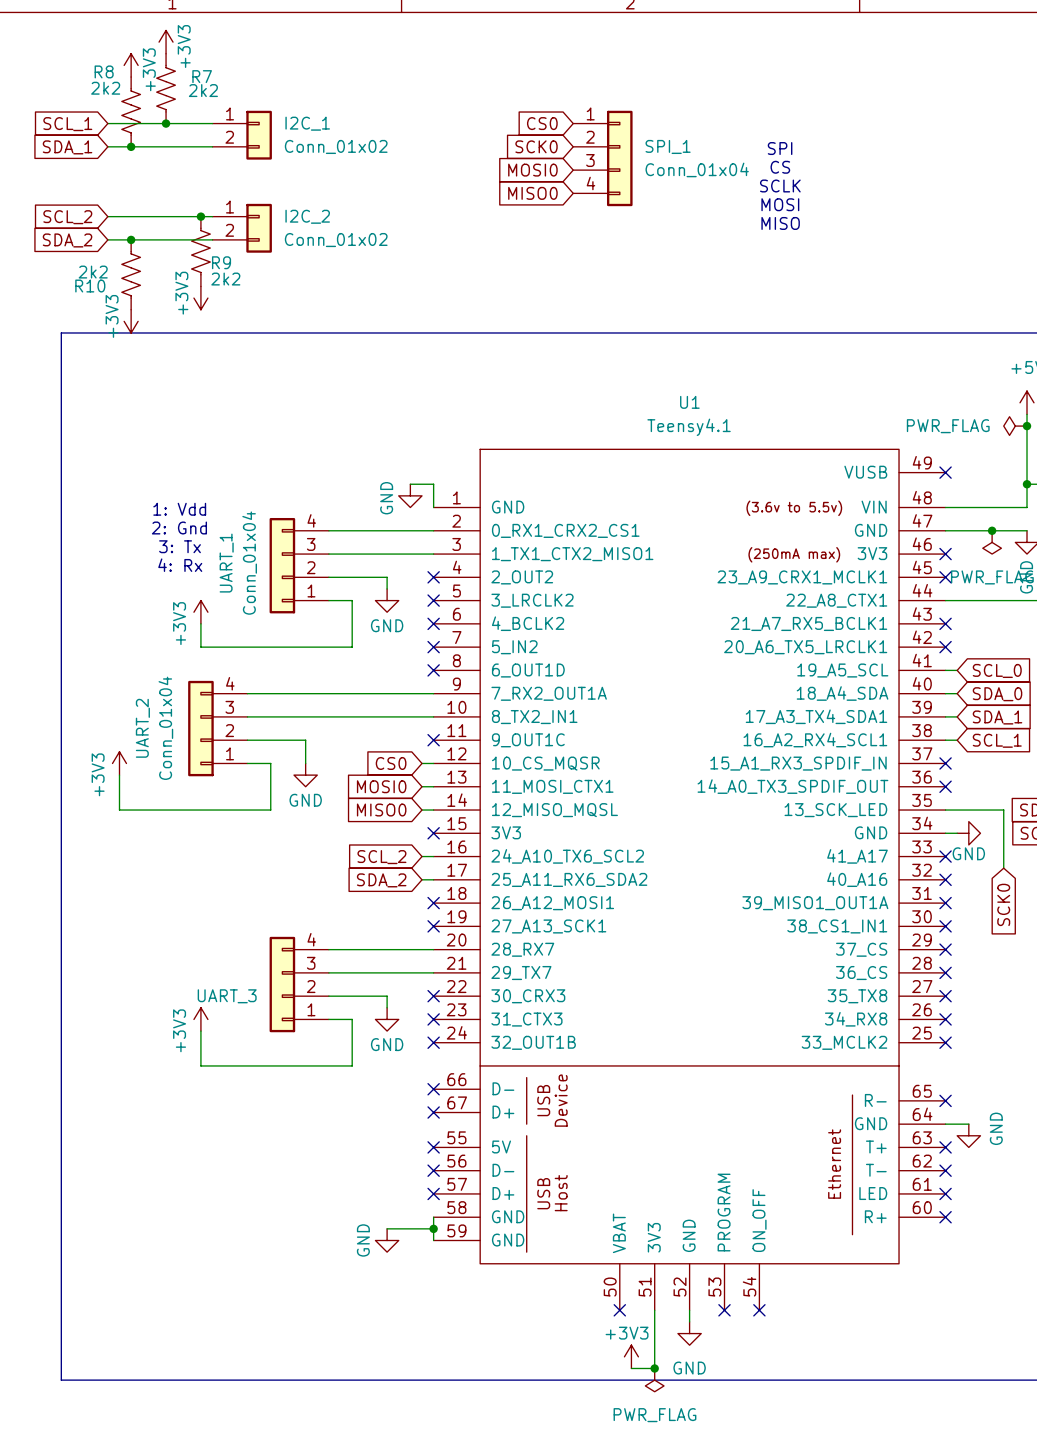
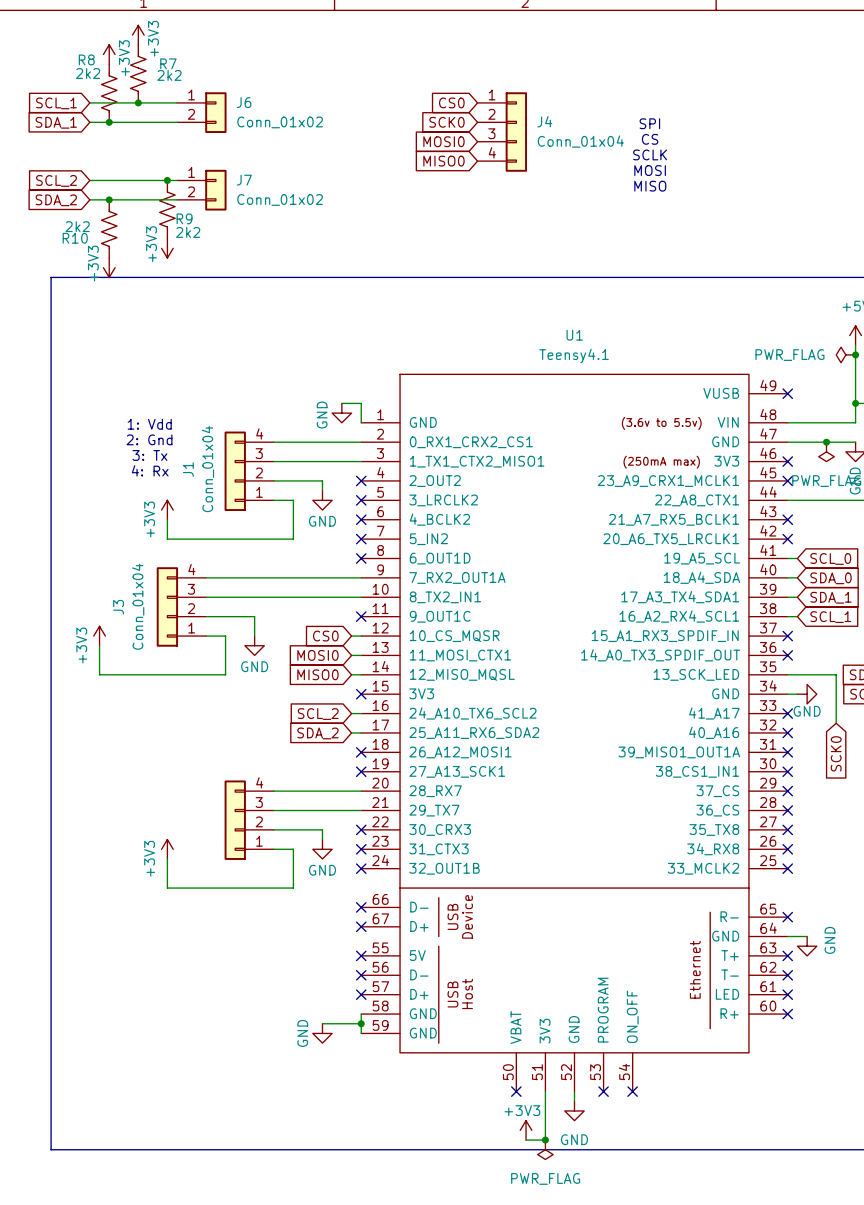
I2C_1 name: I2C_1 (307, 123) -> J6 (244, 102)
SPI_1 name: SPI_1 (668, 146) -> J4 (544, 121)
I2C_2 name: I2C_2 (307, 216) -> J7 (244, 180)
UART_1 name: UART_1 (226, 563) -> J1 (188, 469)
UART_2 name: UART_2 (142, 728) -> J3 (118, 607)
UART_3 name: UART_3 (227, 996) -> none

